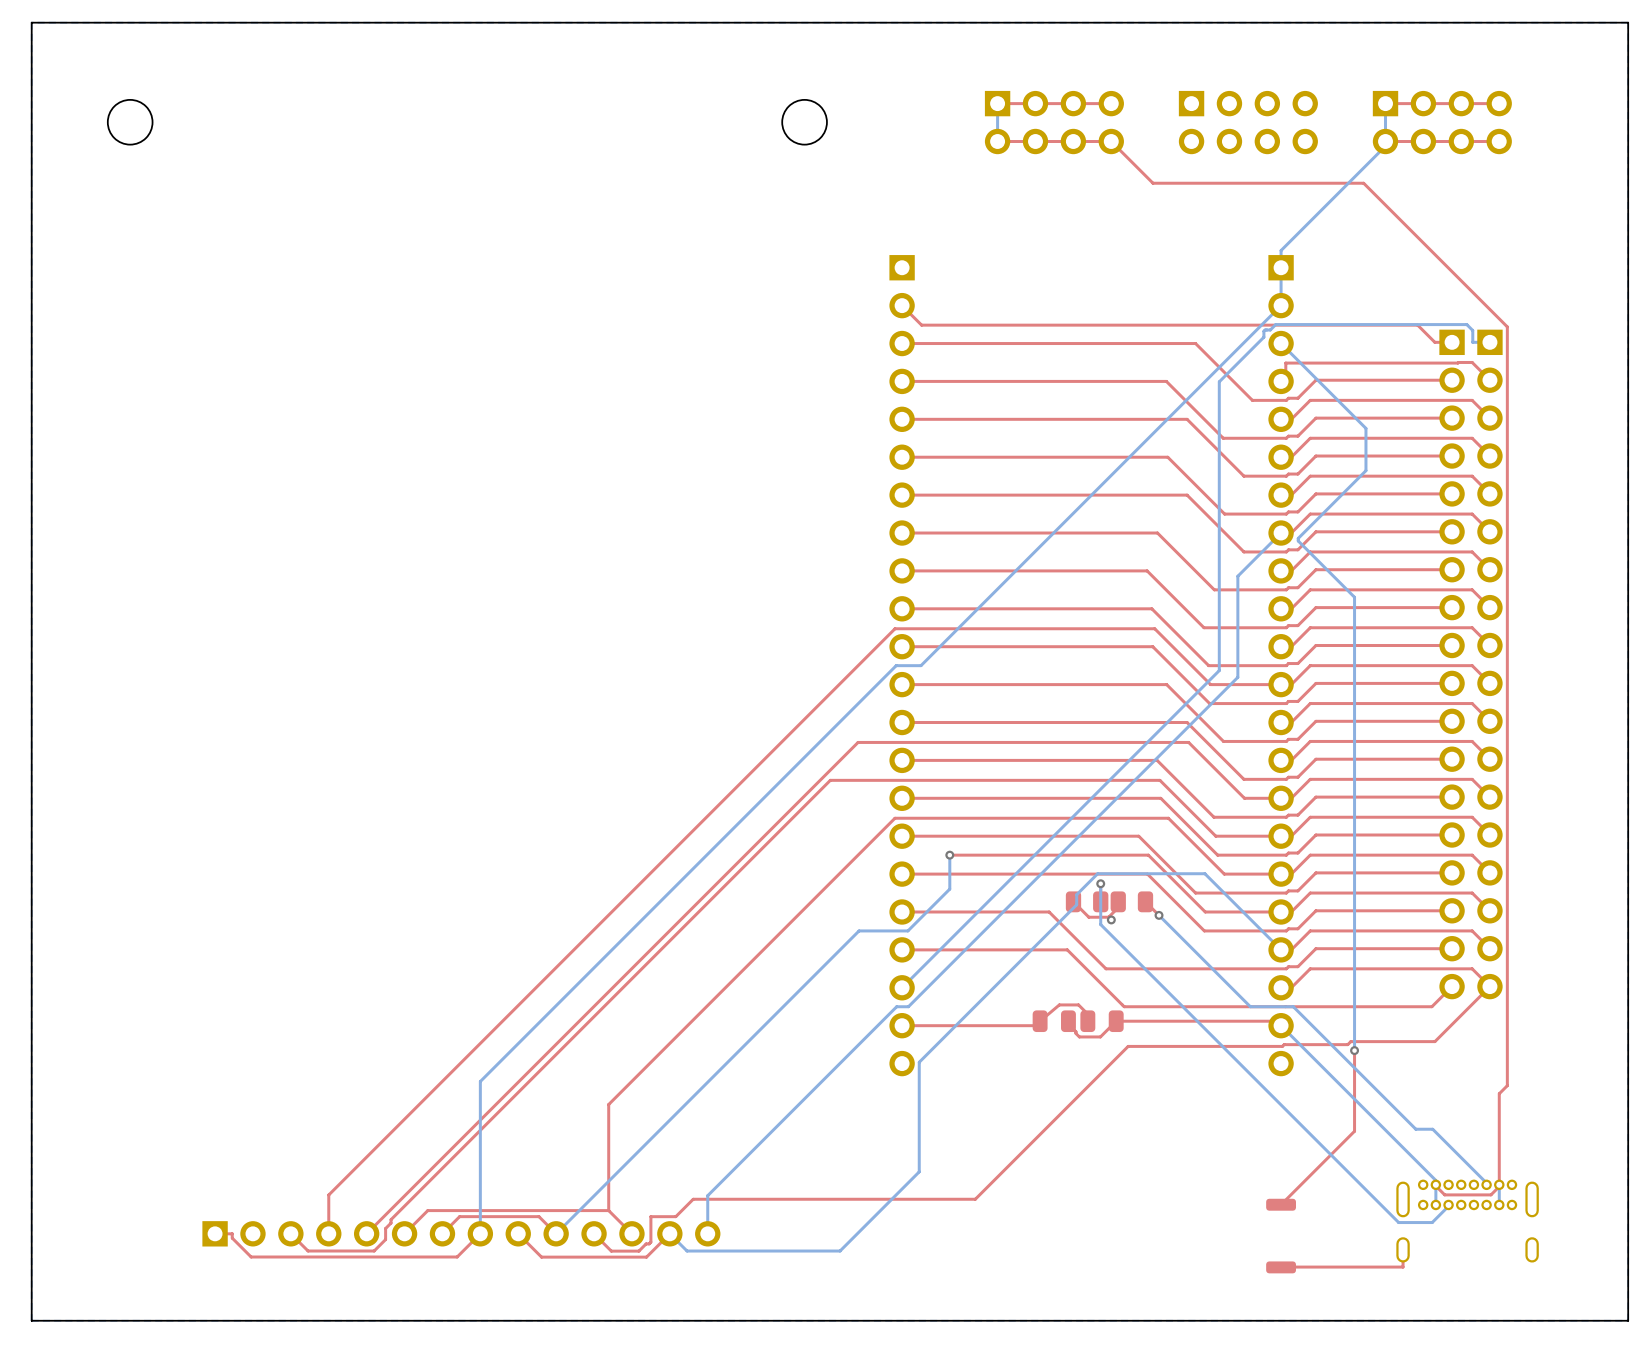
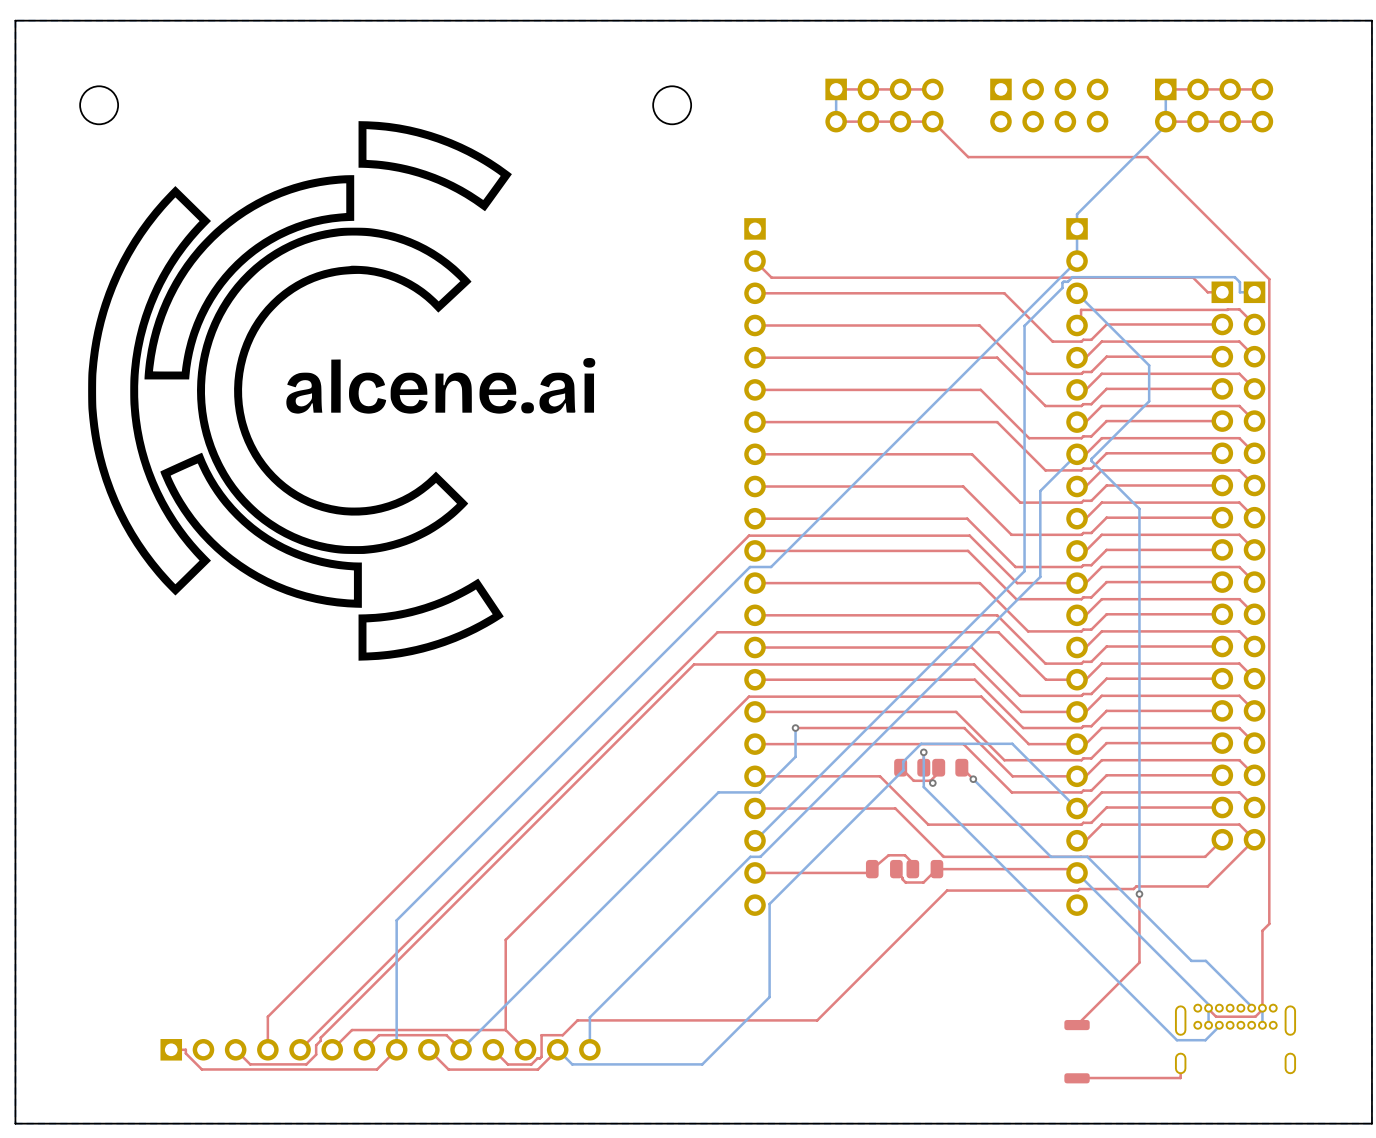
drawing: none -> [88, 121, 596, 661]

